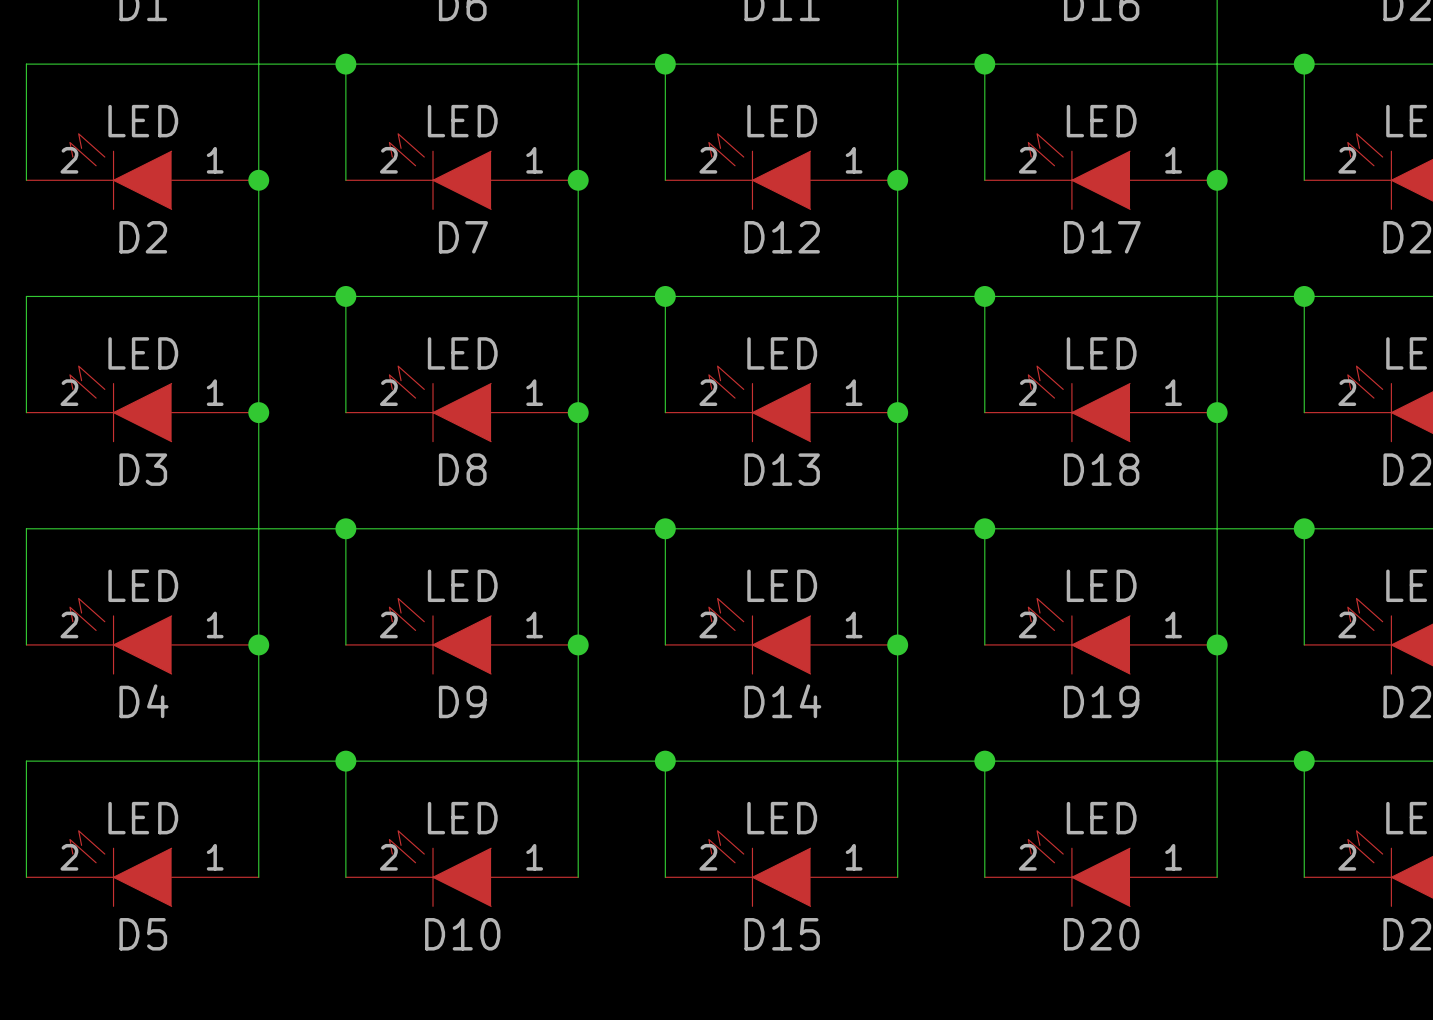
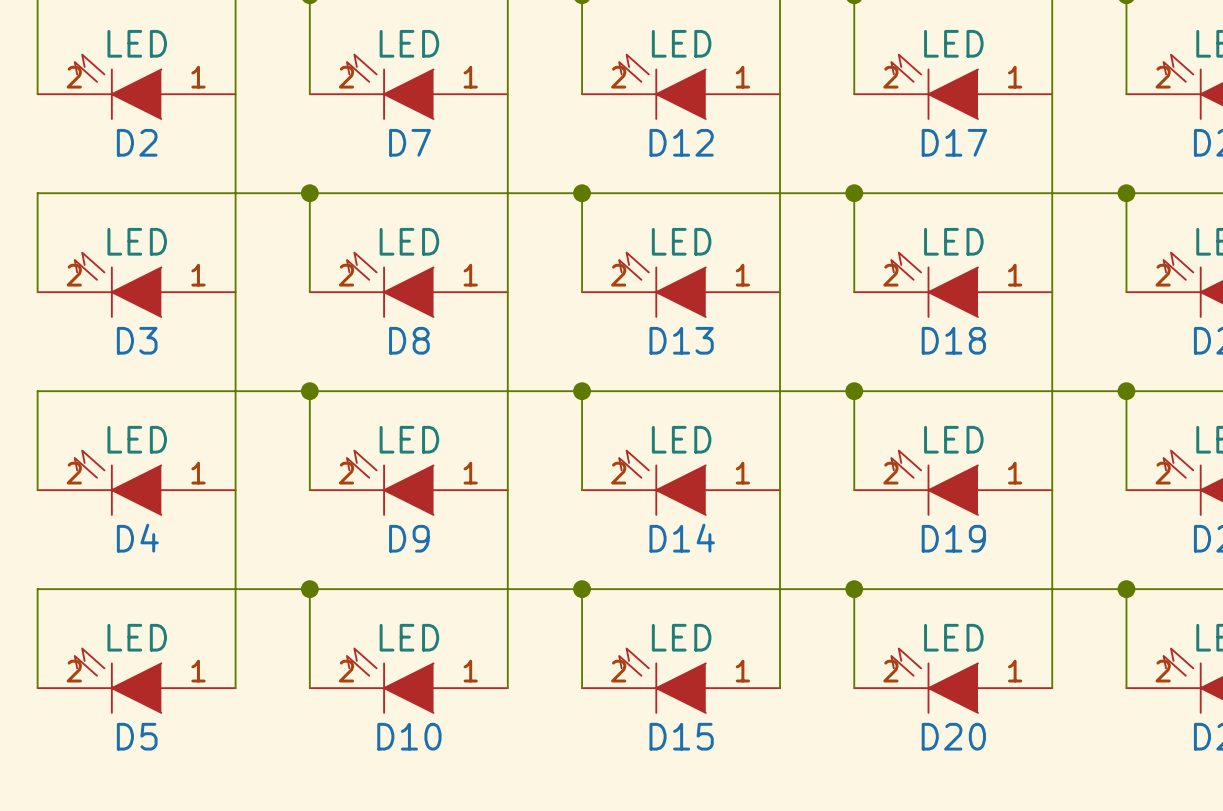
junction: (258, 180) -> none
junction: (578, 180) -> none
junction: (897, 180) -> none
junction: (1217, 180) -> none
junction: (258, 412) -> none
junction: (578, 412) -> none
junction: (897, 412) -> none
junction: (1217, 412) -> none
junction: (258, 644) -> none
junction: (578, 644) -> none
junction: (897, 644) -> none
junction: (1217, 644) -> none

